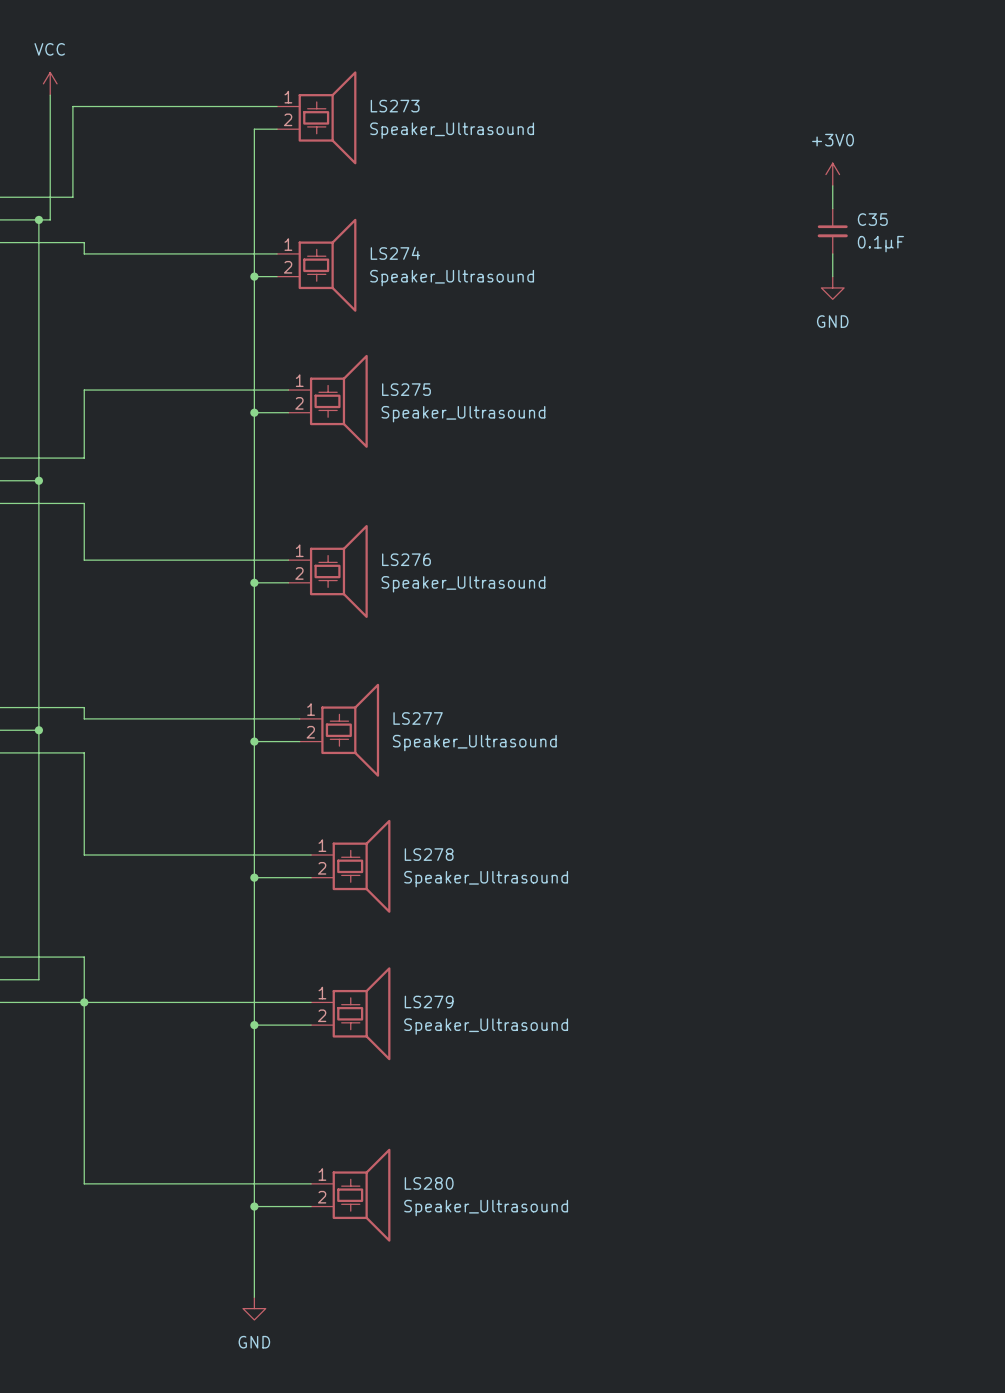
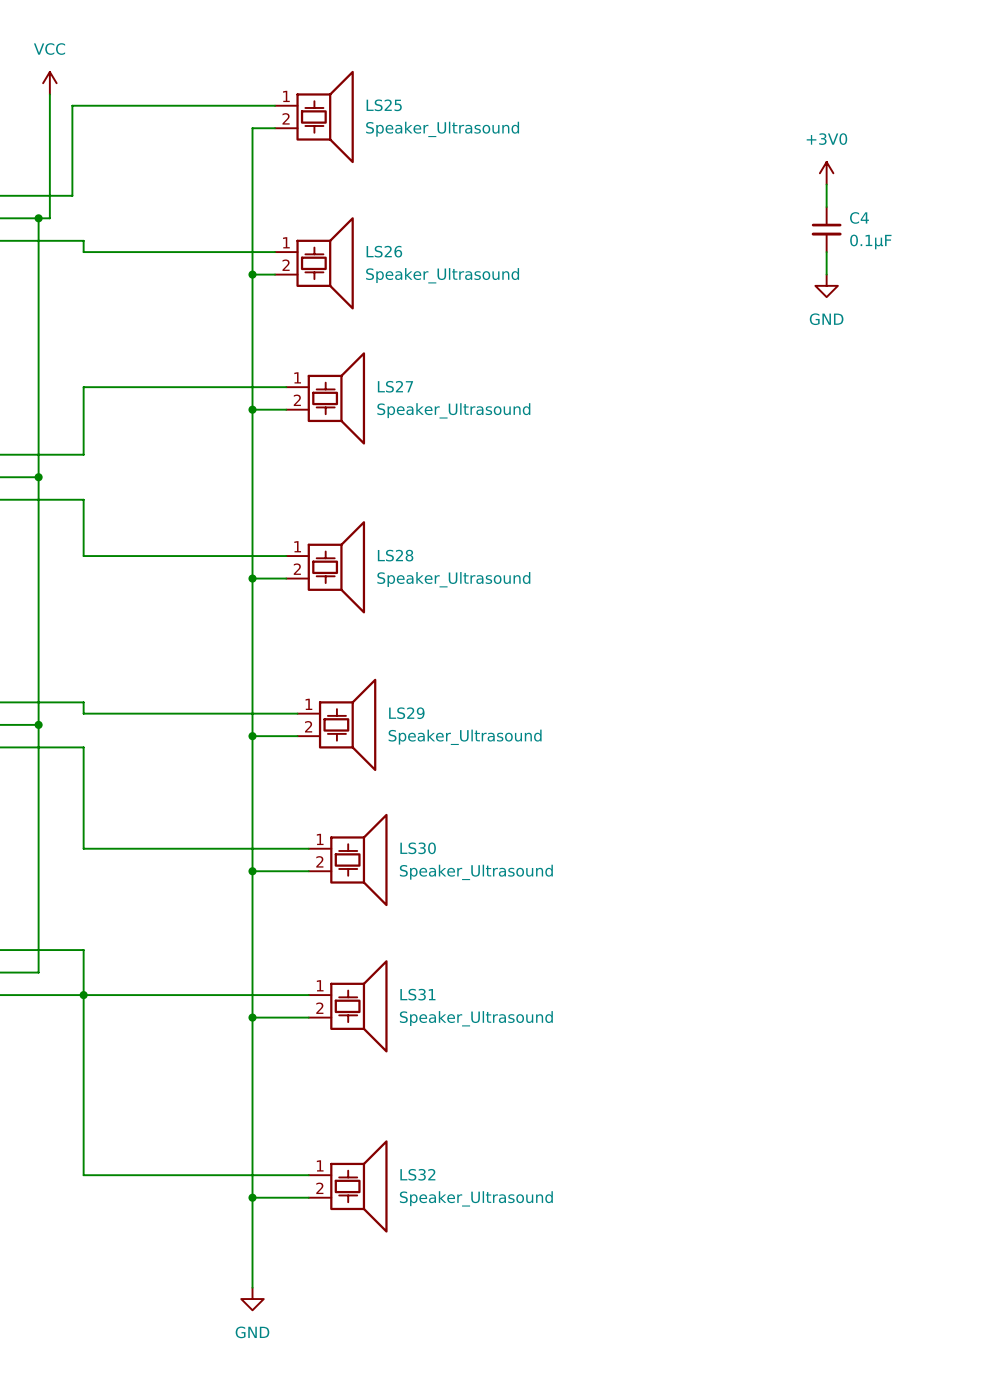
LS273 name: LS273 (395, 106) -> LS25 (384, 105)
C35 name: C35 (872, 219) -> C4 (859, 217)
LS274 name: LS274 (395, 253) -> LS26 (384, 251)
LS275 name: LS275 (406, 389) -> LS27 (395, 386)
LS276 name: LS276 (406, 559) -> LS28 (395, 555)
LS277 name: LS277 (418, 718) -> LS29 (406, 713)
LS278 name: LS278 (429, 854) -> LS30 (418, 848)
LS279 name: LS279 (429, 1002) -> LS31 (417, 994)
LS280 name: LS280 (429, 1183) -> LS32 (417, 1174)

